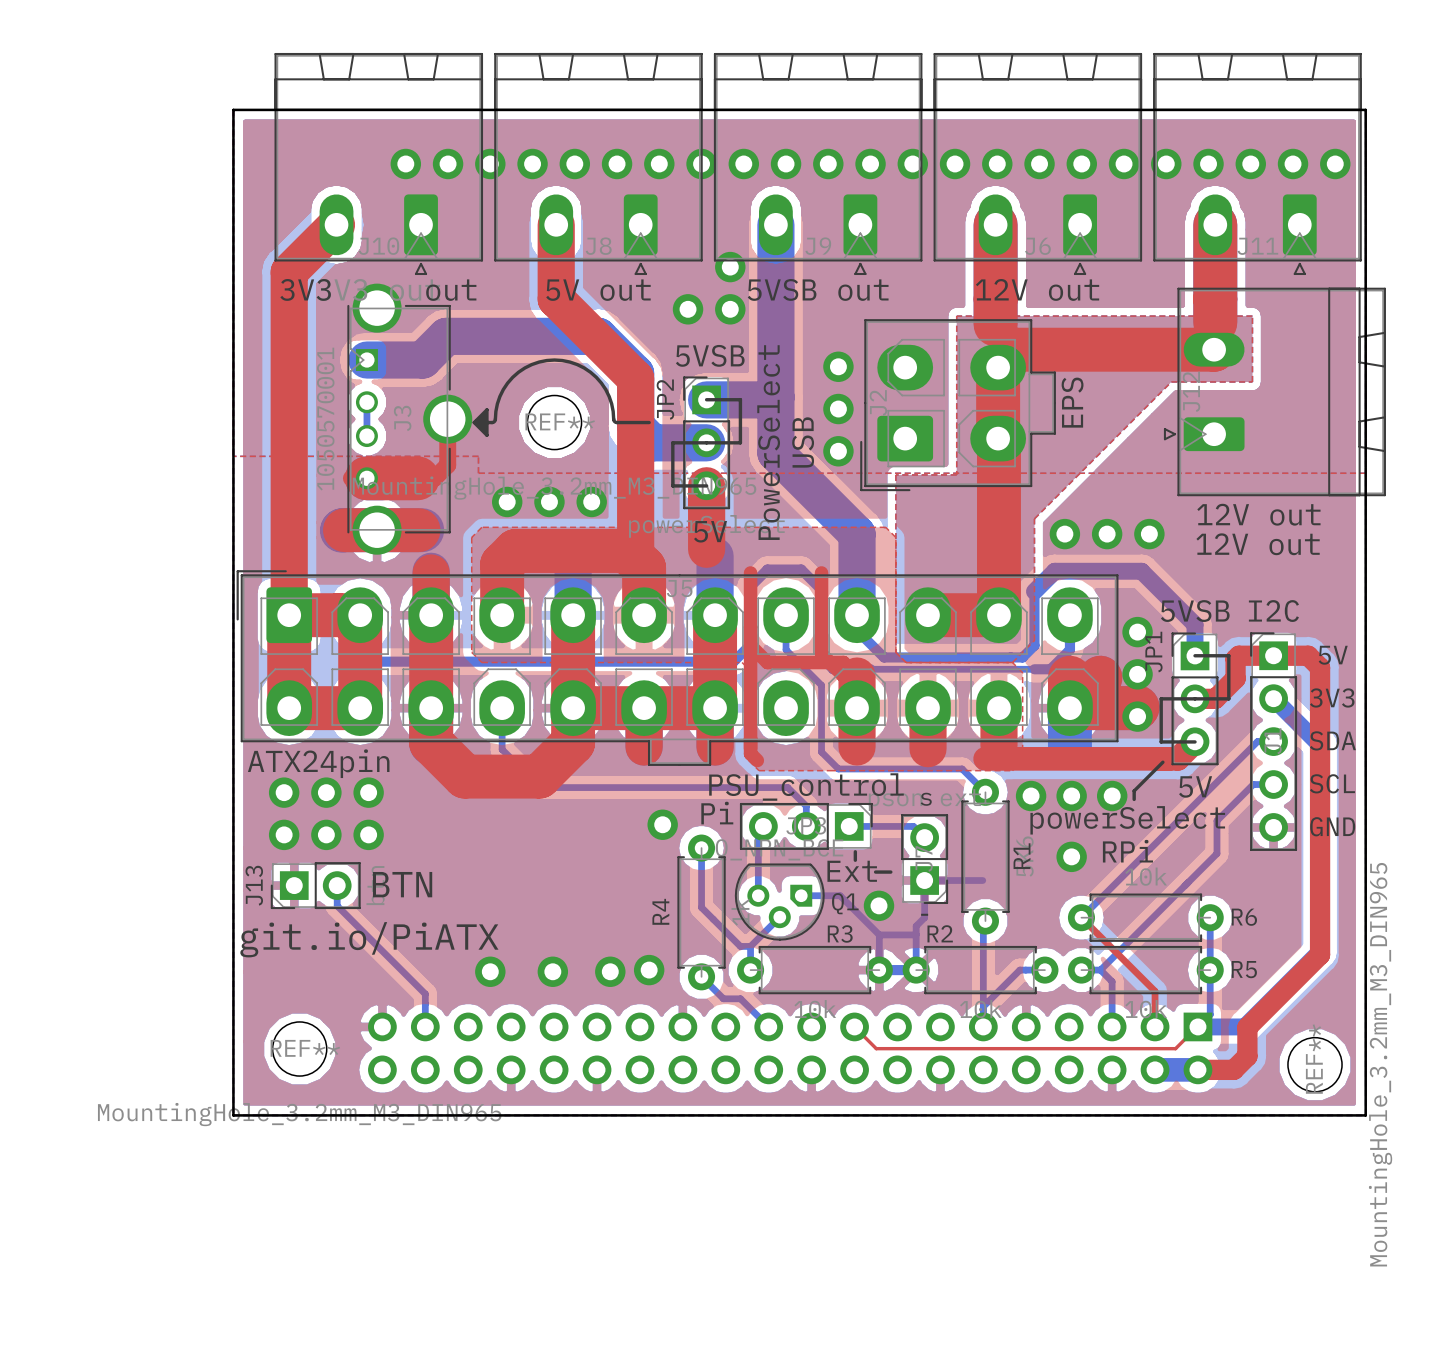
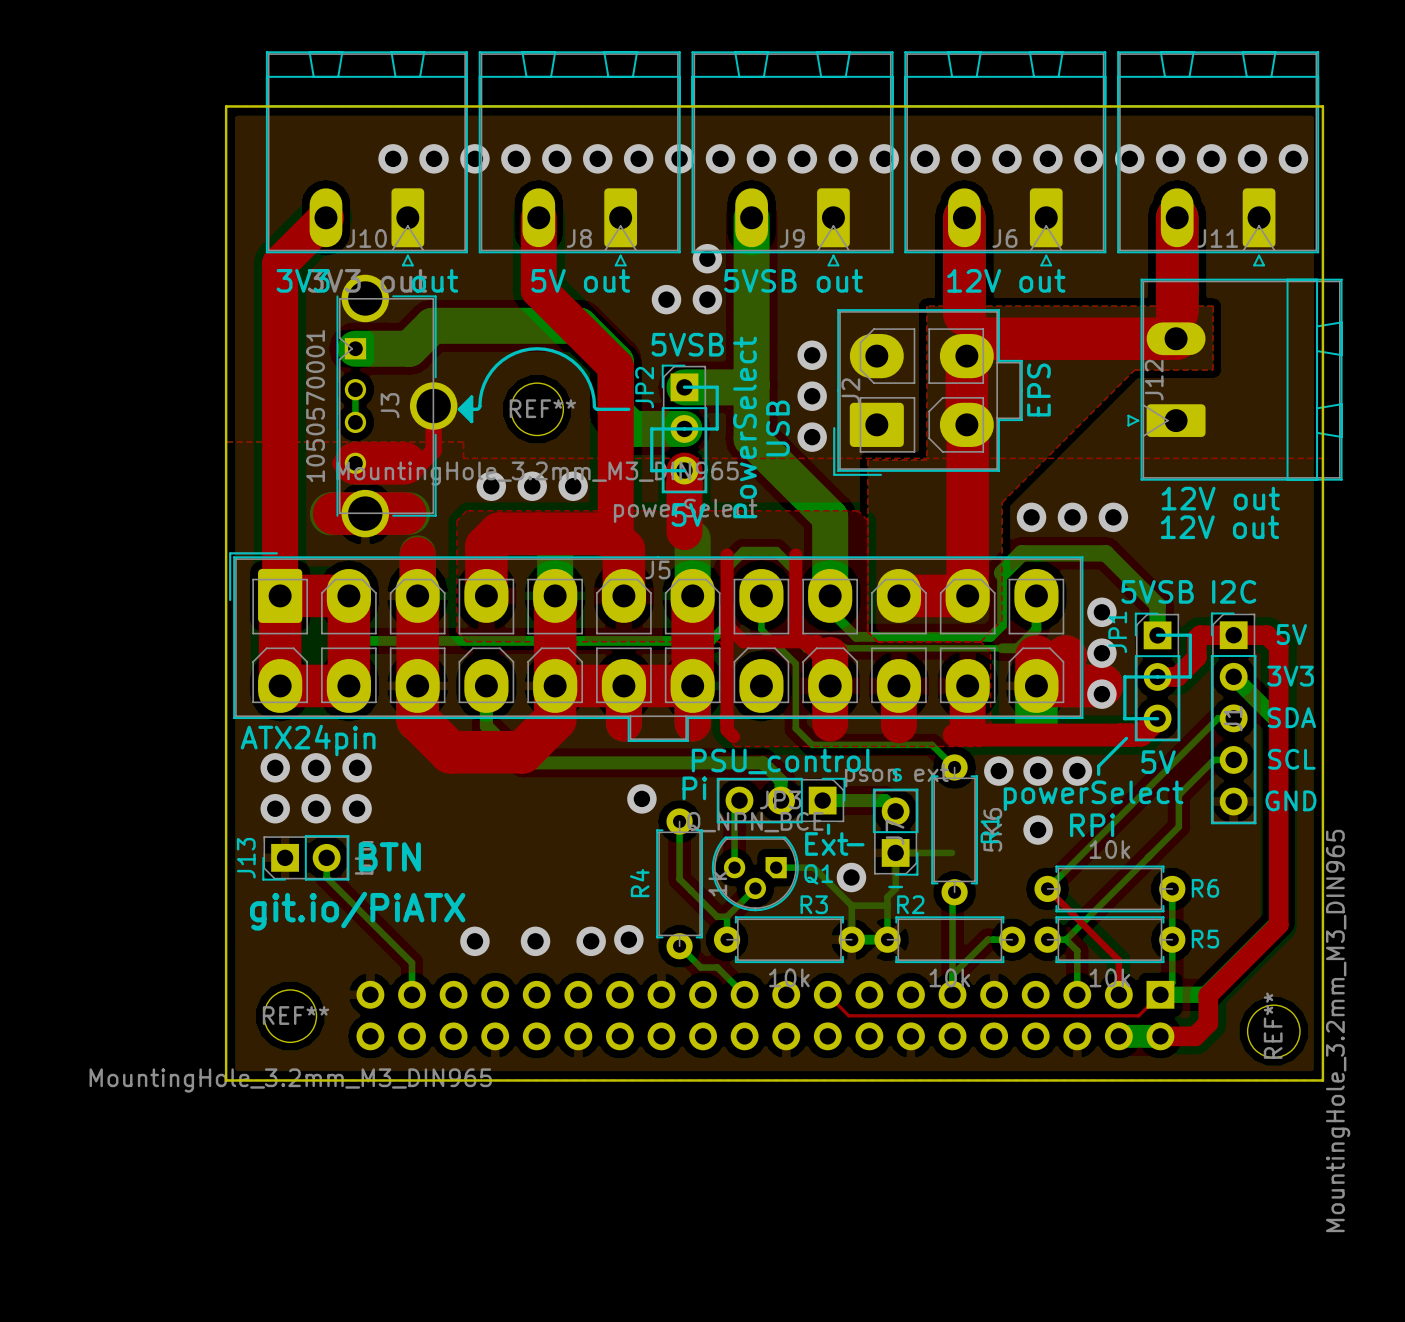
bottom track width: thin (502, 708) (502, 749) (540, 787) (787, 787) (806, 806) (806, 826) -> thick (486, 685) (486, 726) (523, 762) (763, 762) (781, 780) (781, 800)
bottom track width: thin (849, 826) (913, 826) (924, 837) -> thick (822, 800) (884, 800) (895, 811)

